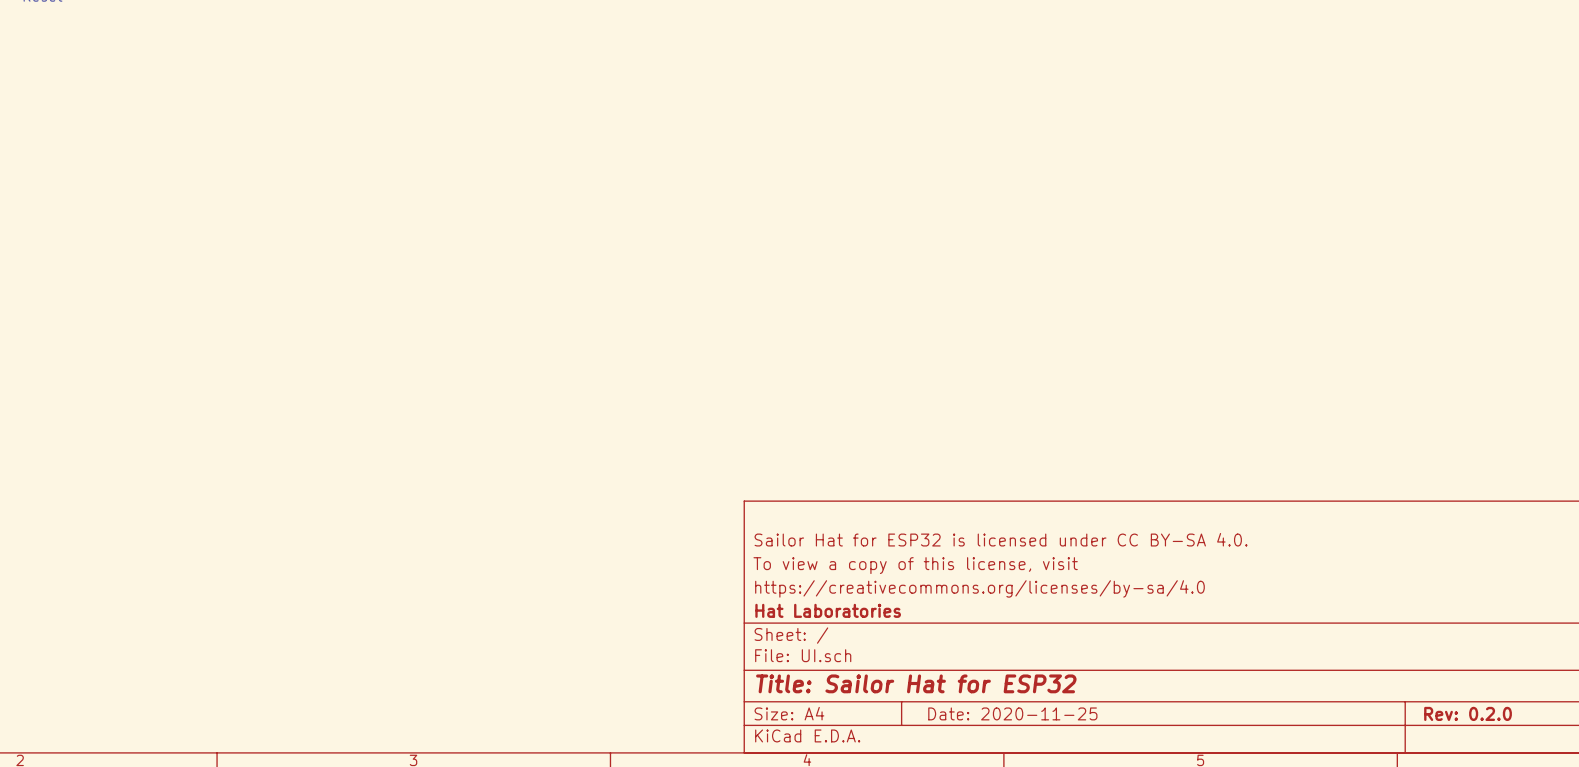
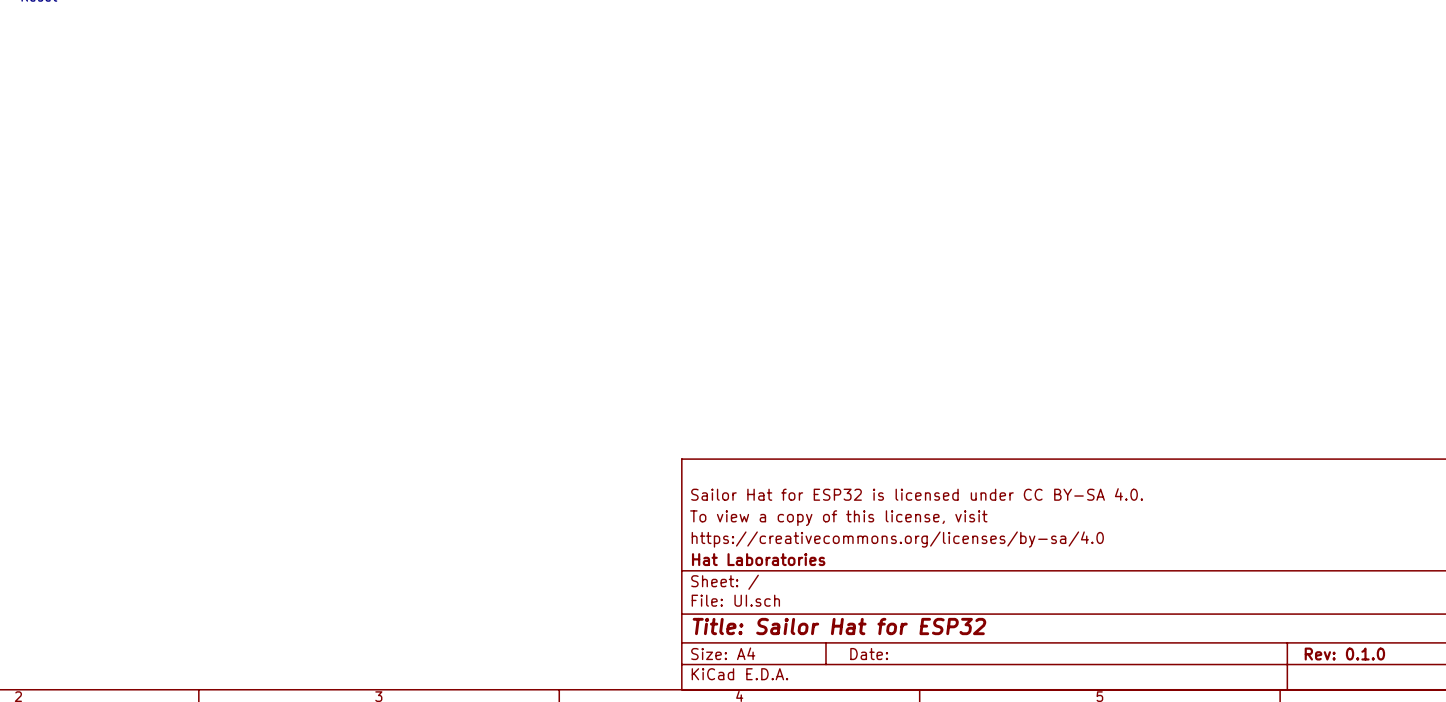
title block: Date: 2020-11-25 (1012, 713) -> Date: (869, 654)
title block: Rev: 0.2.0 (1468, 713) -> Rev: 0.1.0 (1344, 654)

